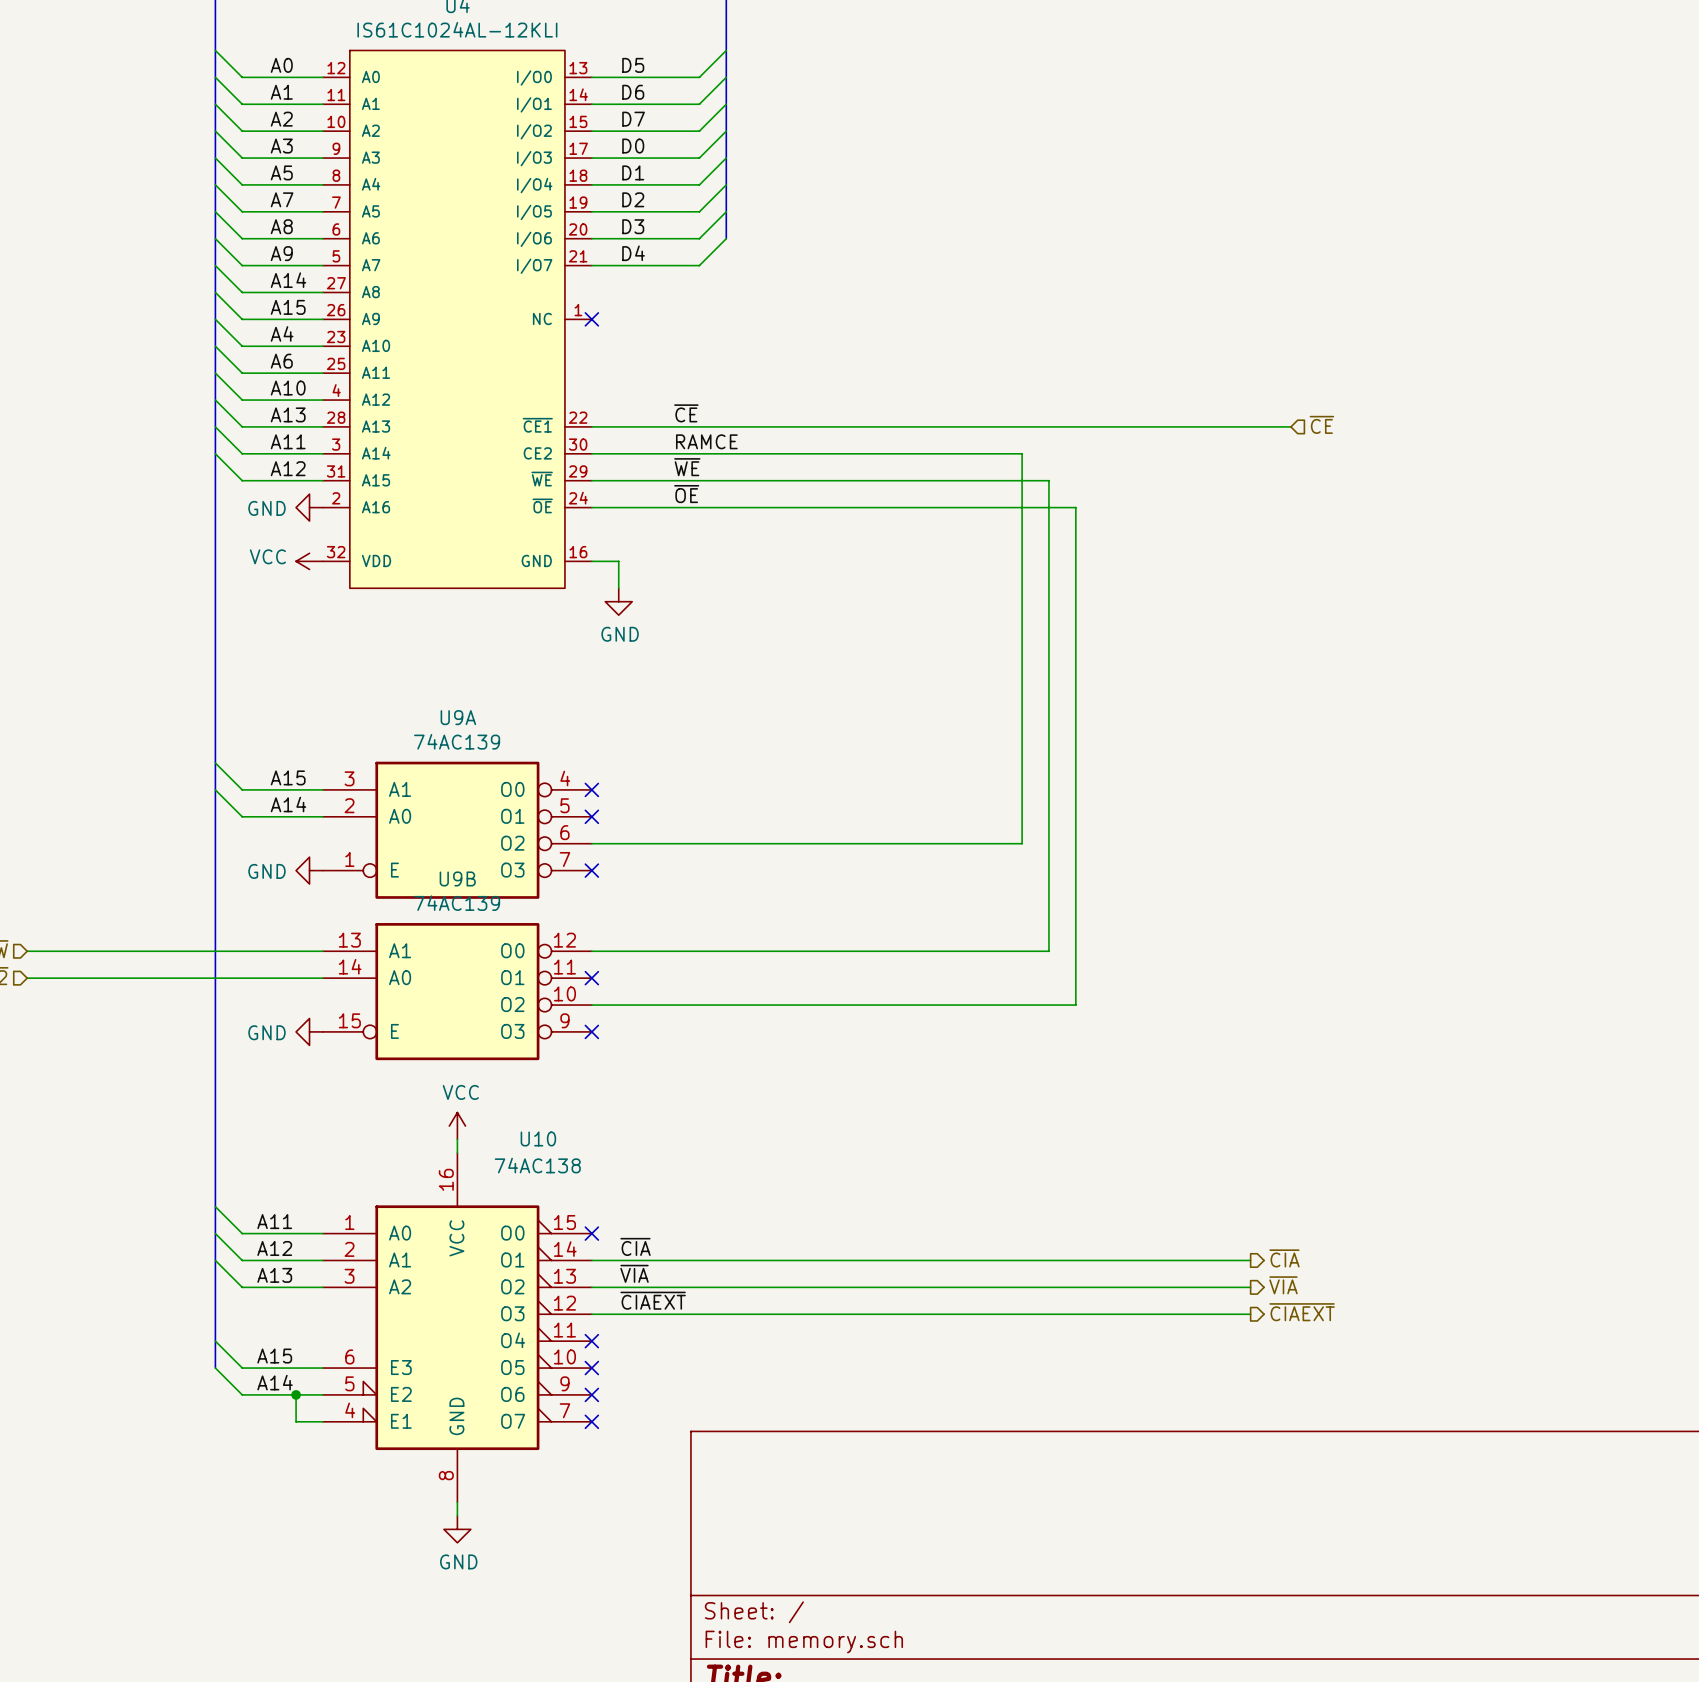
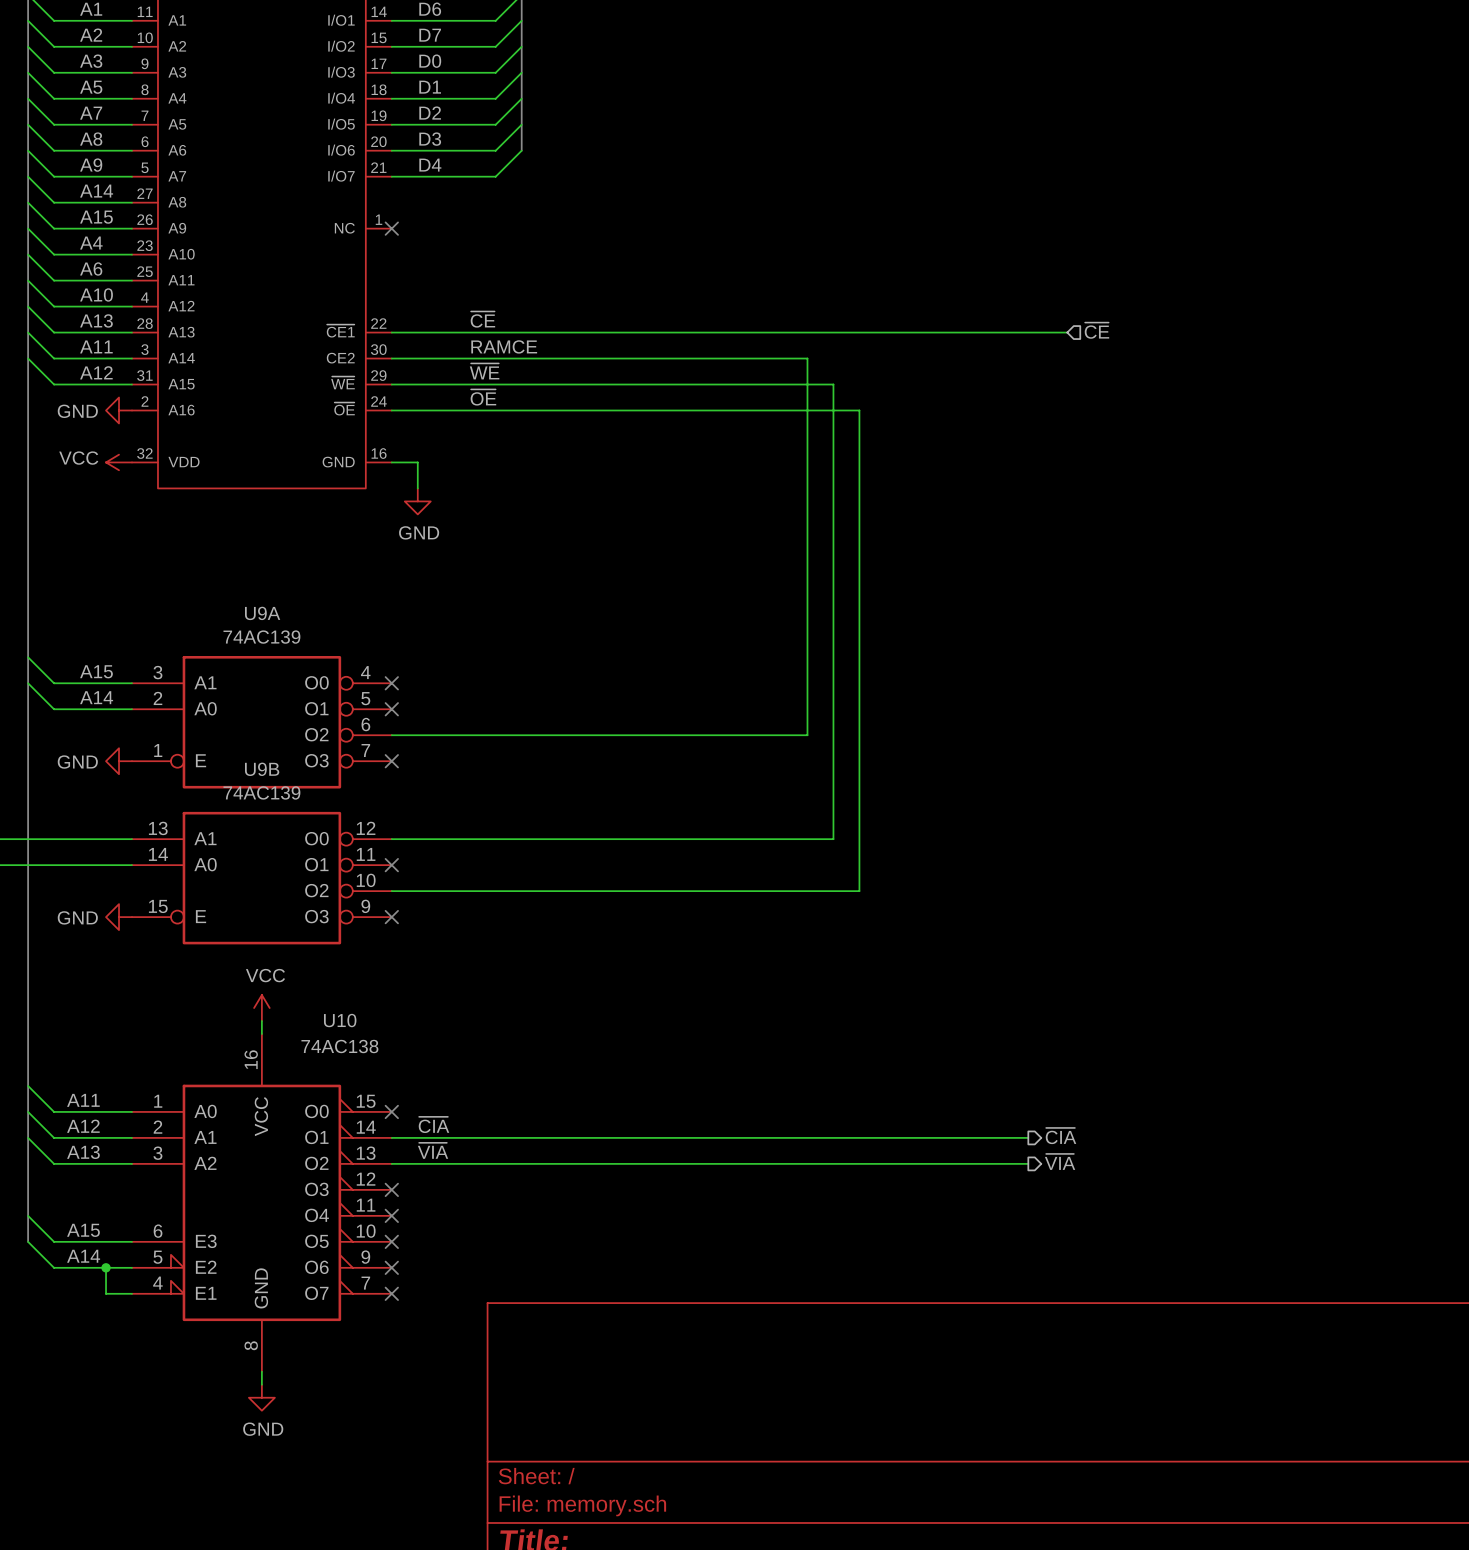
label: ~{CIAEXT} (653, 1300) -> none
hierarchical label: ~{CIAEXT} (1302, 1312) -> none
wire: (591, 1314) (1250, 1314) -> none
no-connect mark: none -> (391, 1189)

